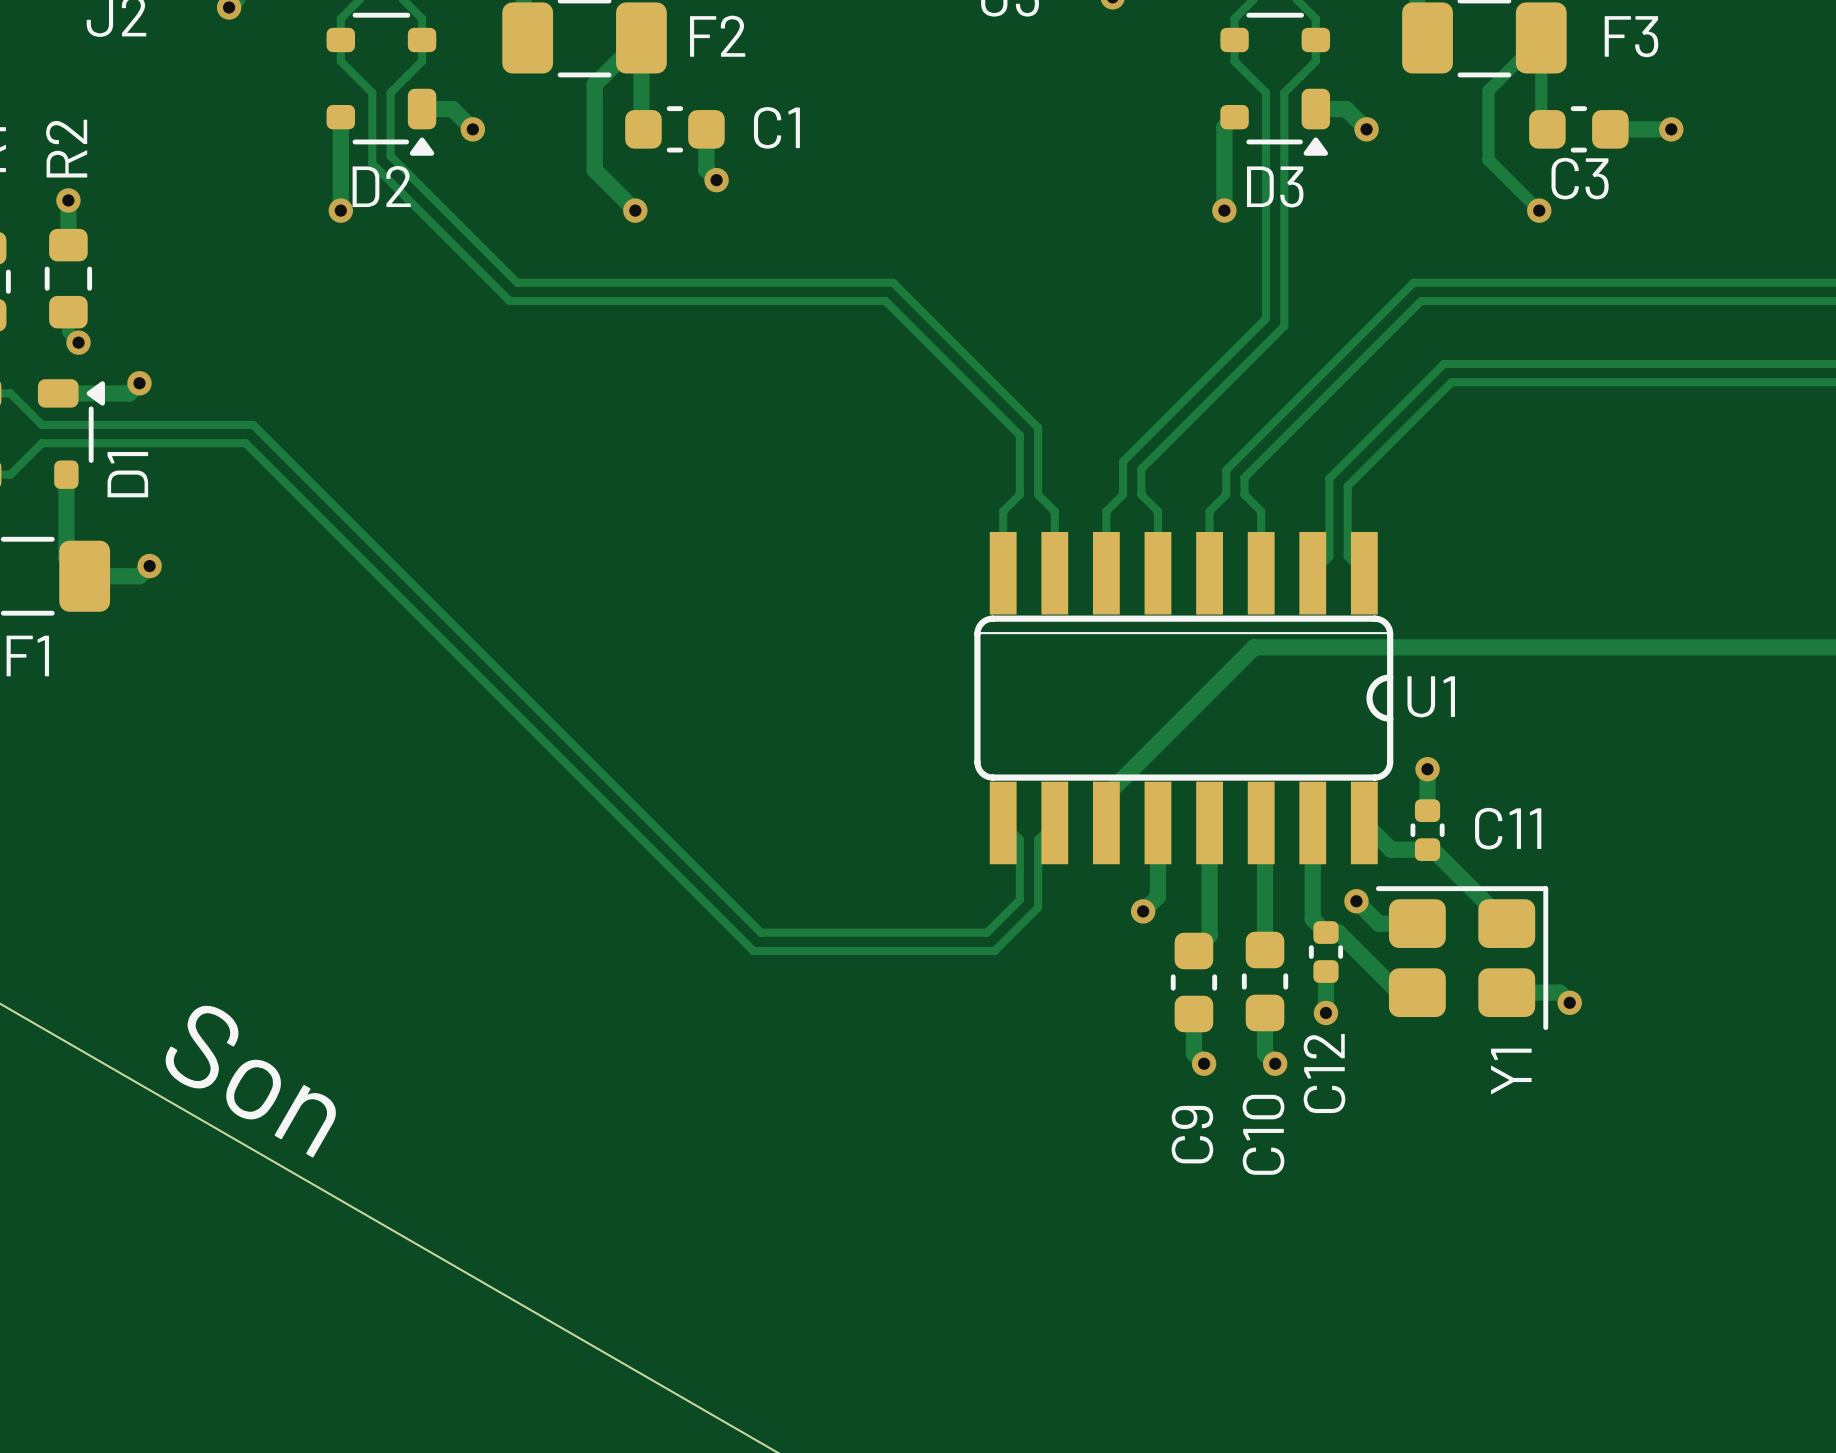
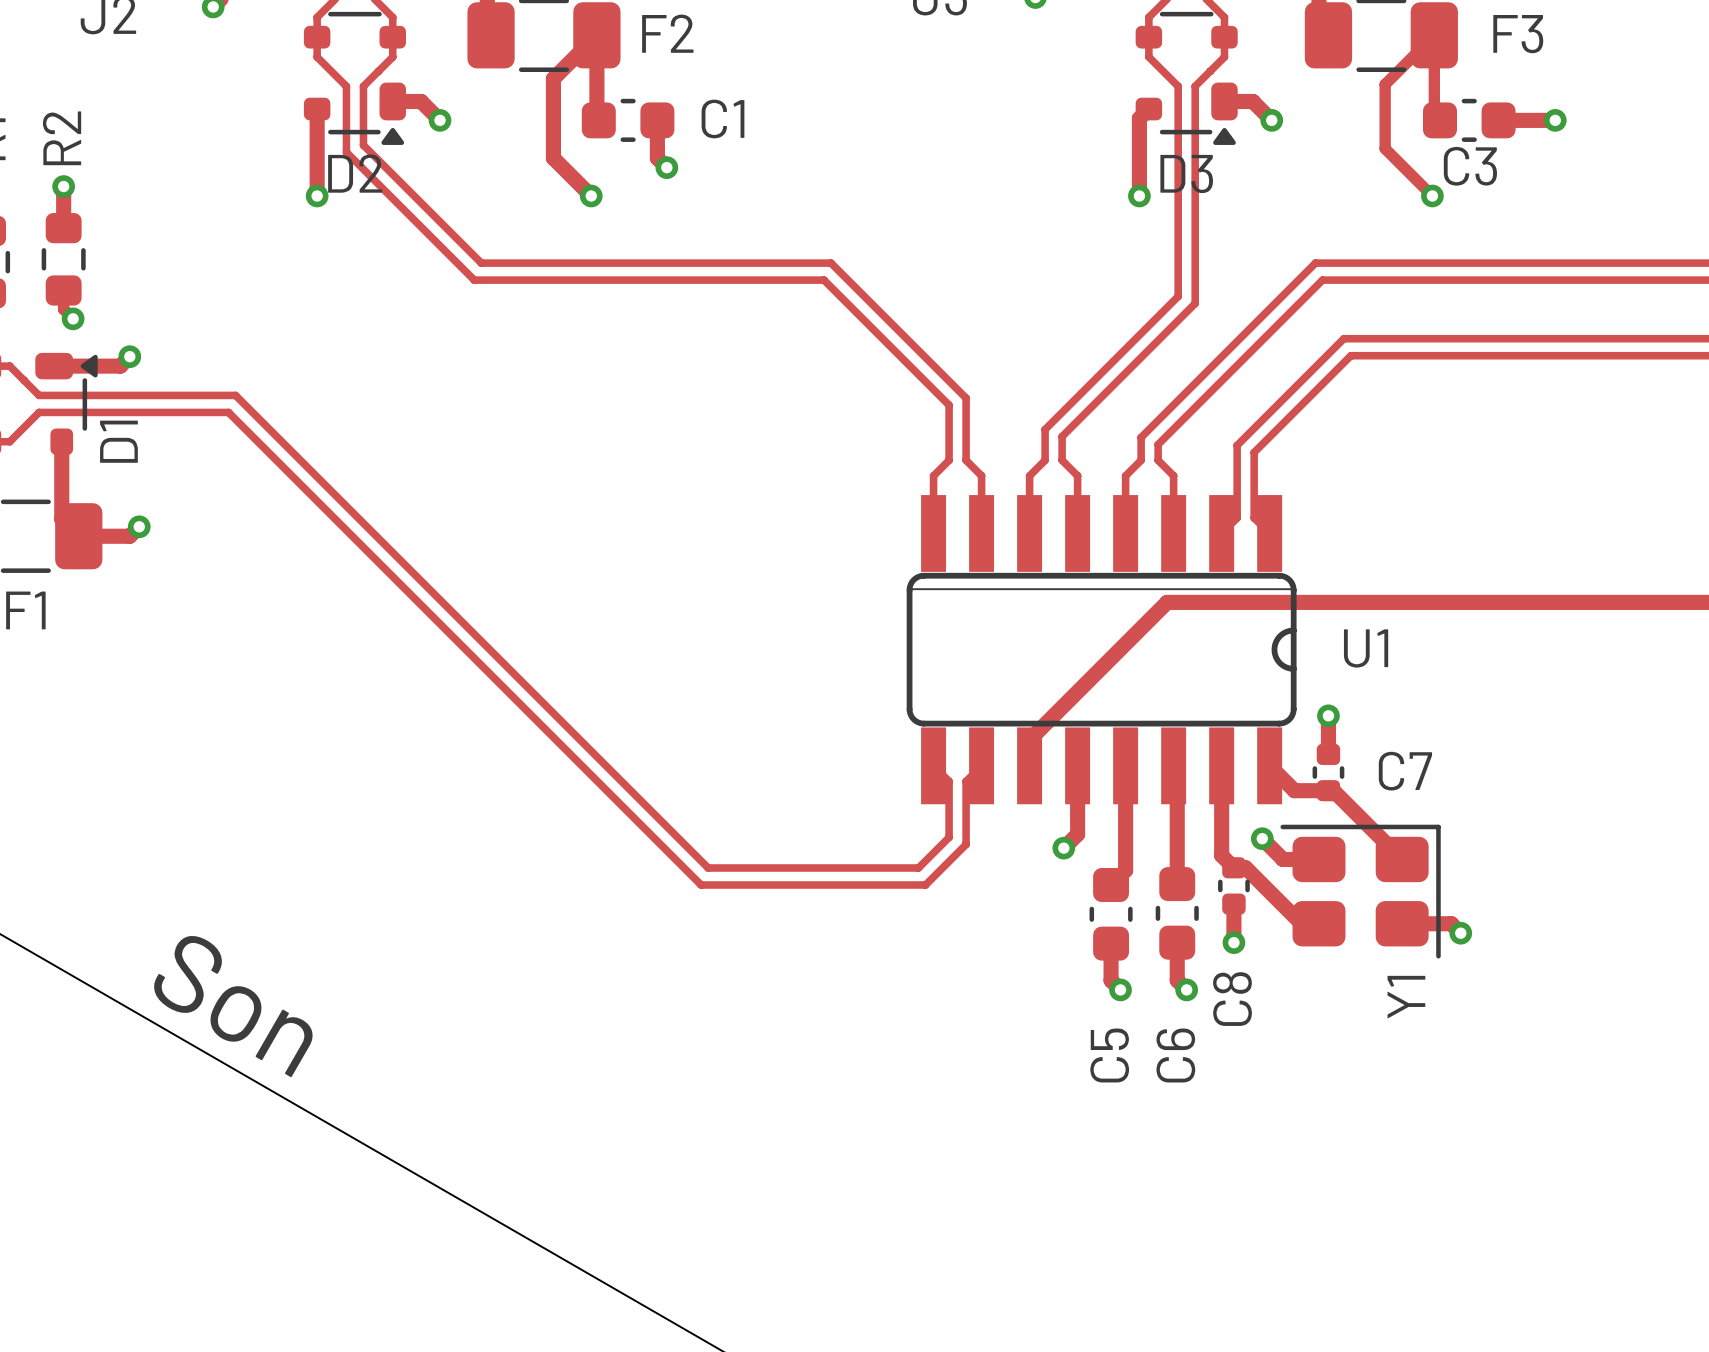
U1 name position: U1 (1431, 696) -> U1 (1366, 648)
C11 name: C11 (1508, 828) -> C7 (1405, 771)
C12 name: C12 (1324, 1073) -> C8 (1232, 999)
C9 name: C9 (1192, 1134) -> C5 (1109, 1055)
C10 name: C10 (1263, 1134) -> C6 (1175, 1055)

